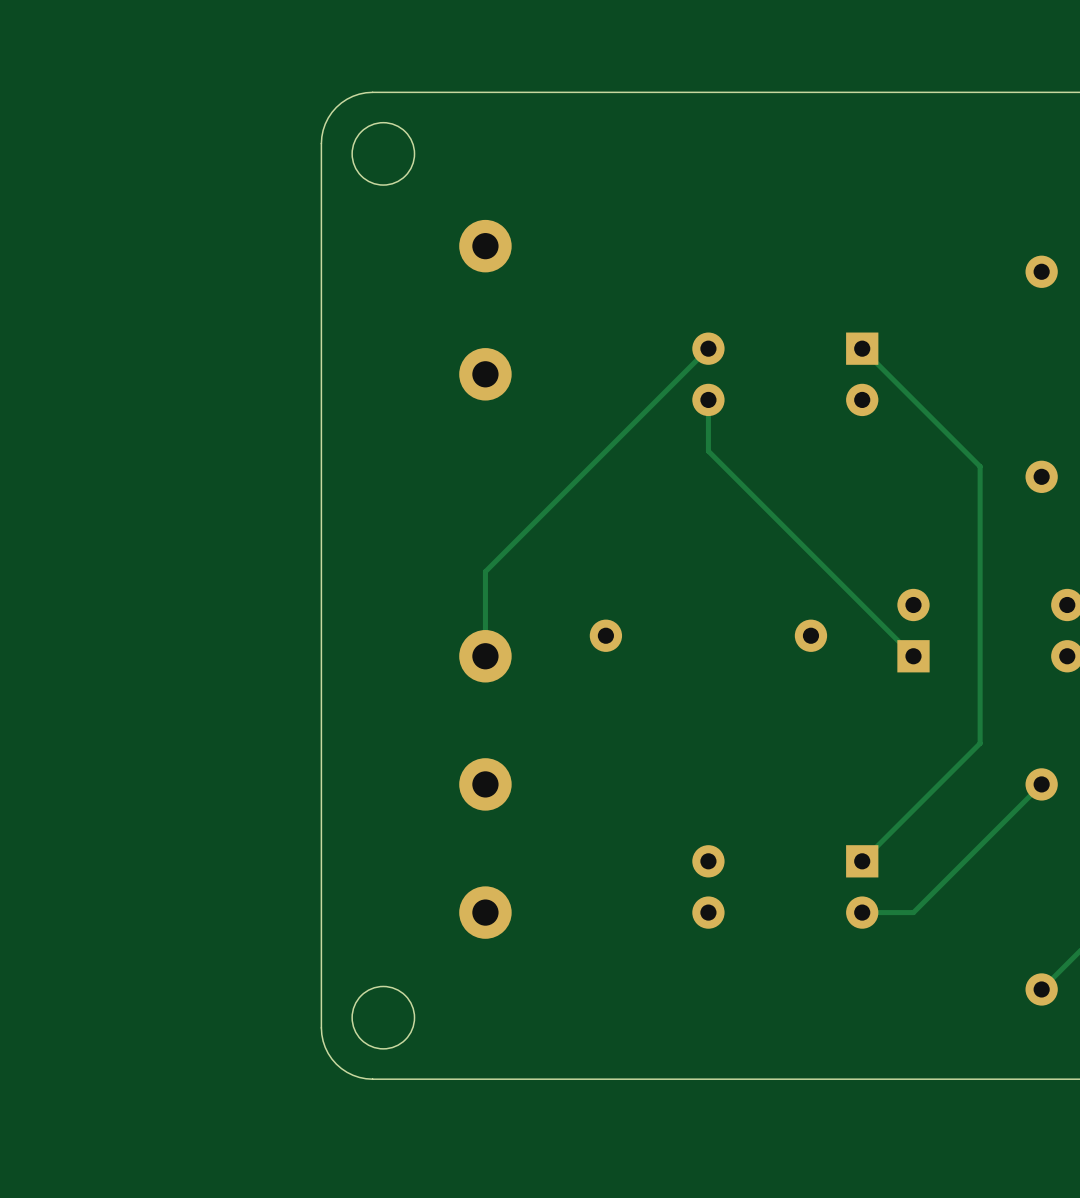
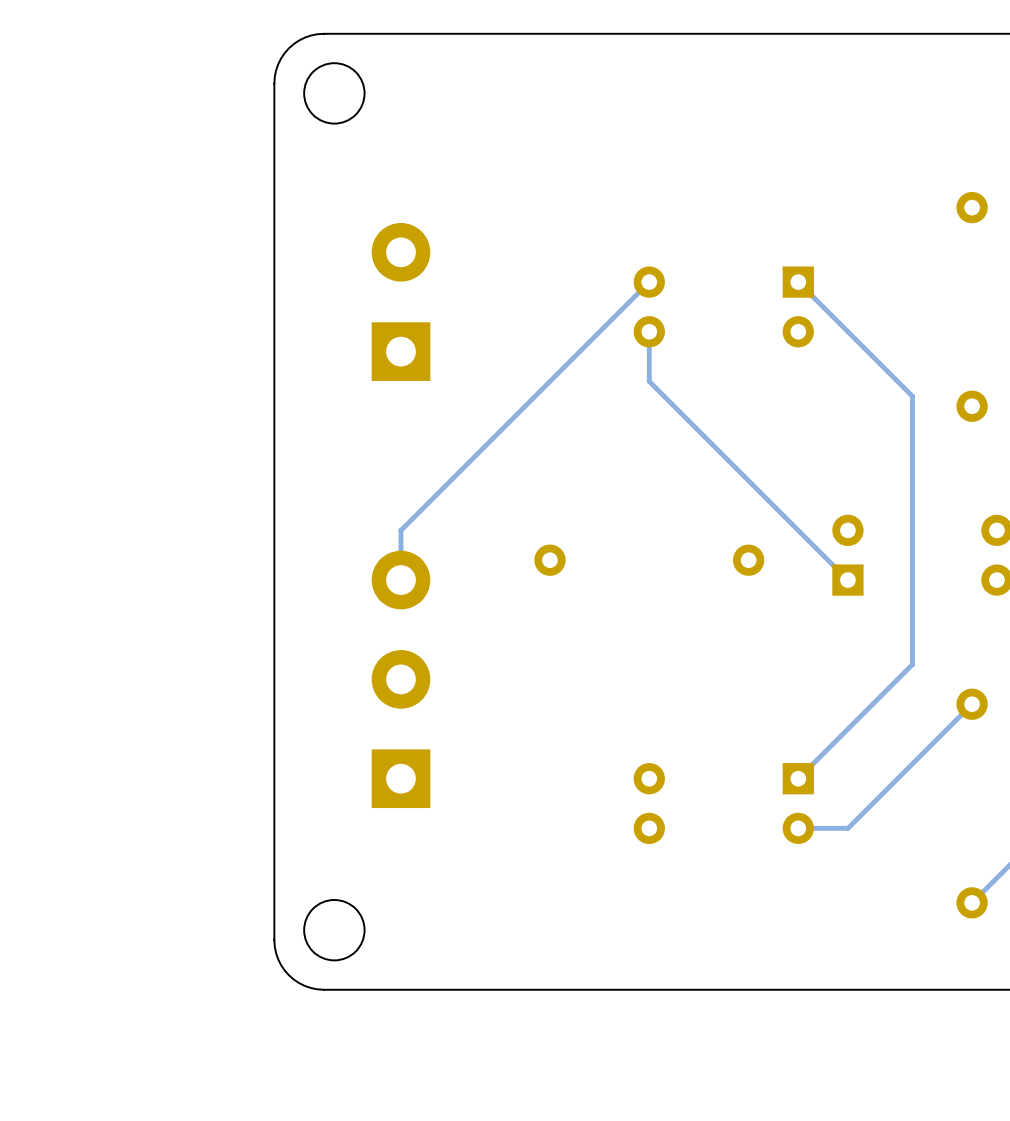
part: (485, 246) -> none
part: none -> (400, 301)
part: (485, 374) -> none
track: (485, 571) (485, 656) -> (433, 498) (400, 530) (400, 580)
part: (485, 656) -> none
part: none -> (400, 679)
part: (485, 784) -> none
part: (485, 912) -> none

